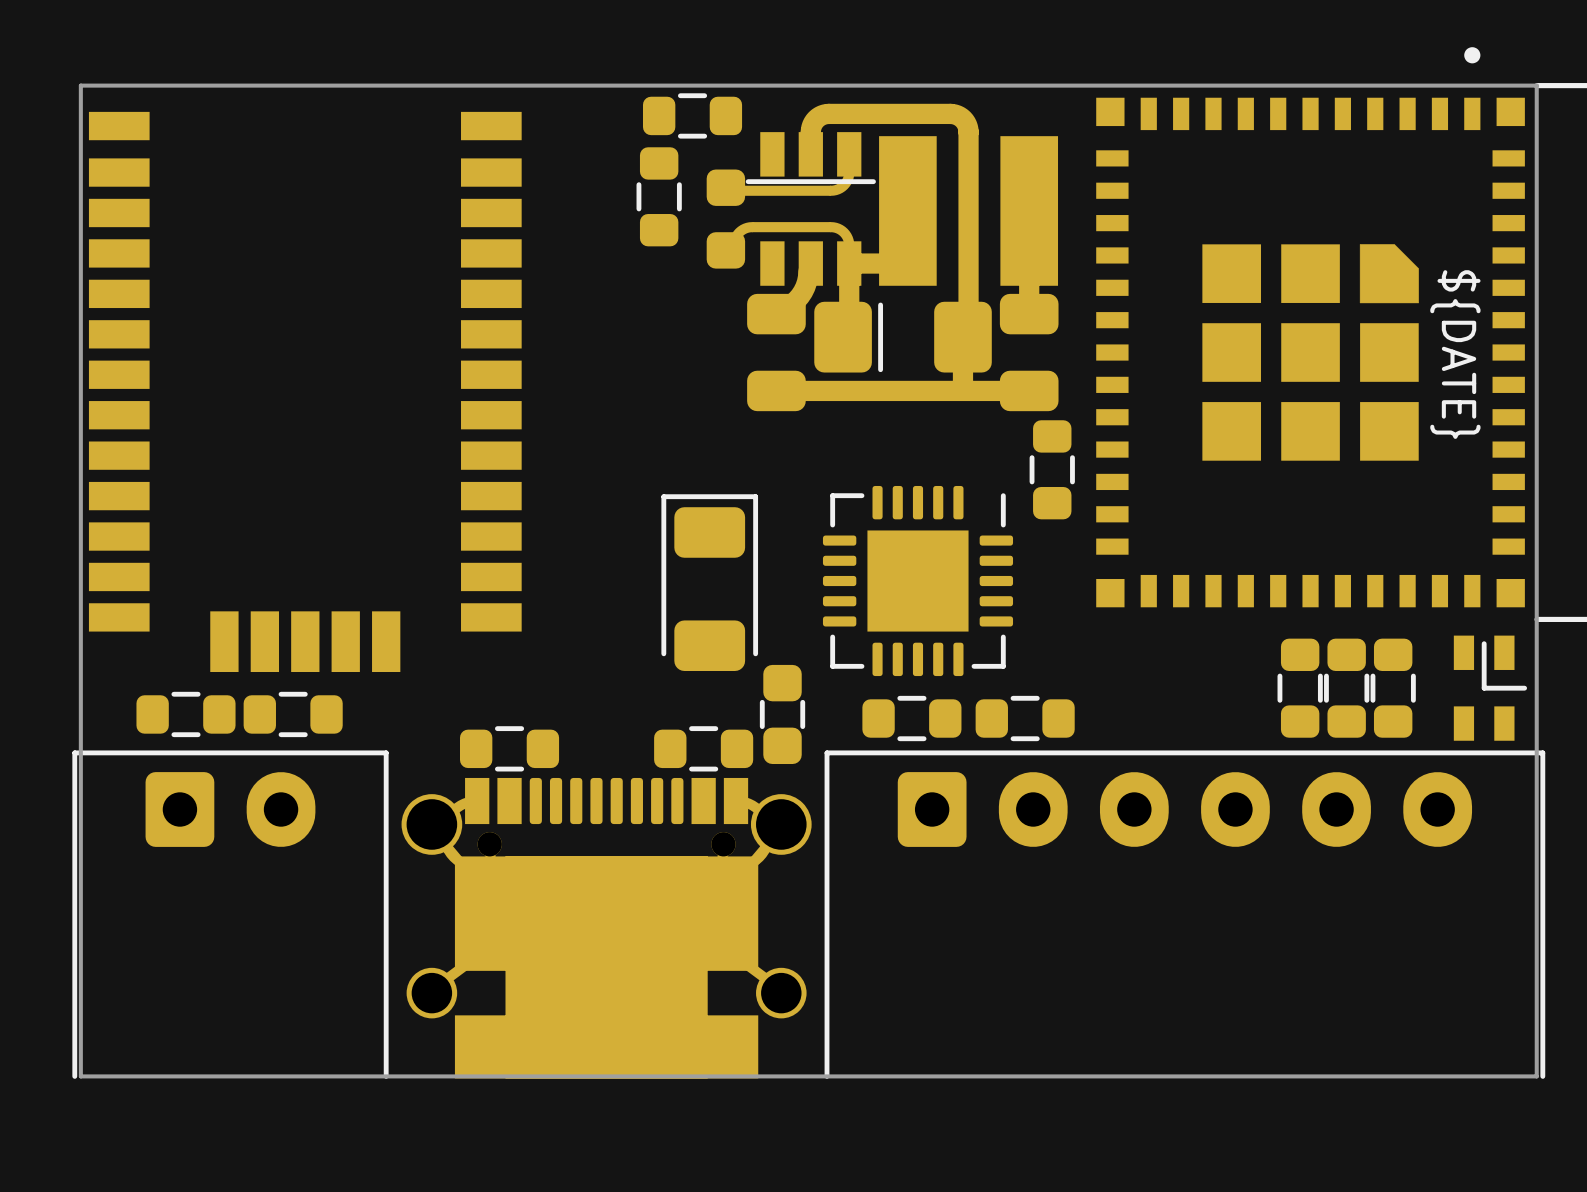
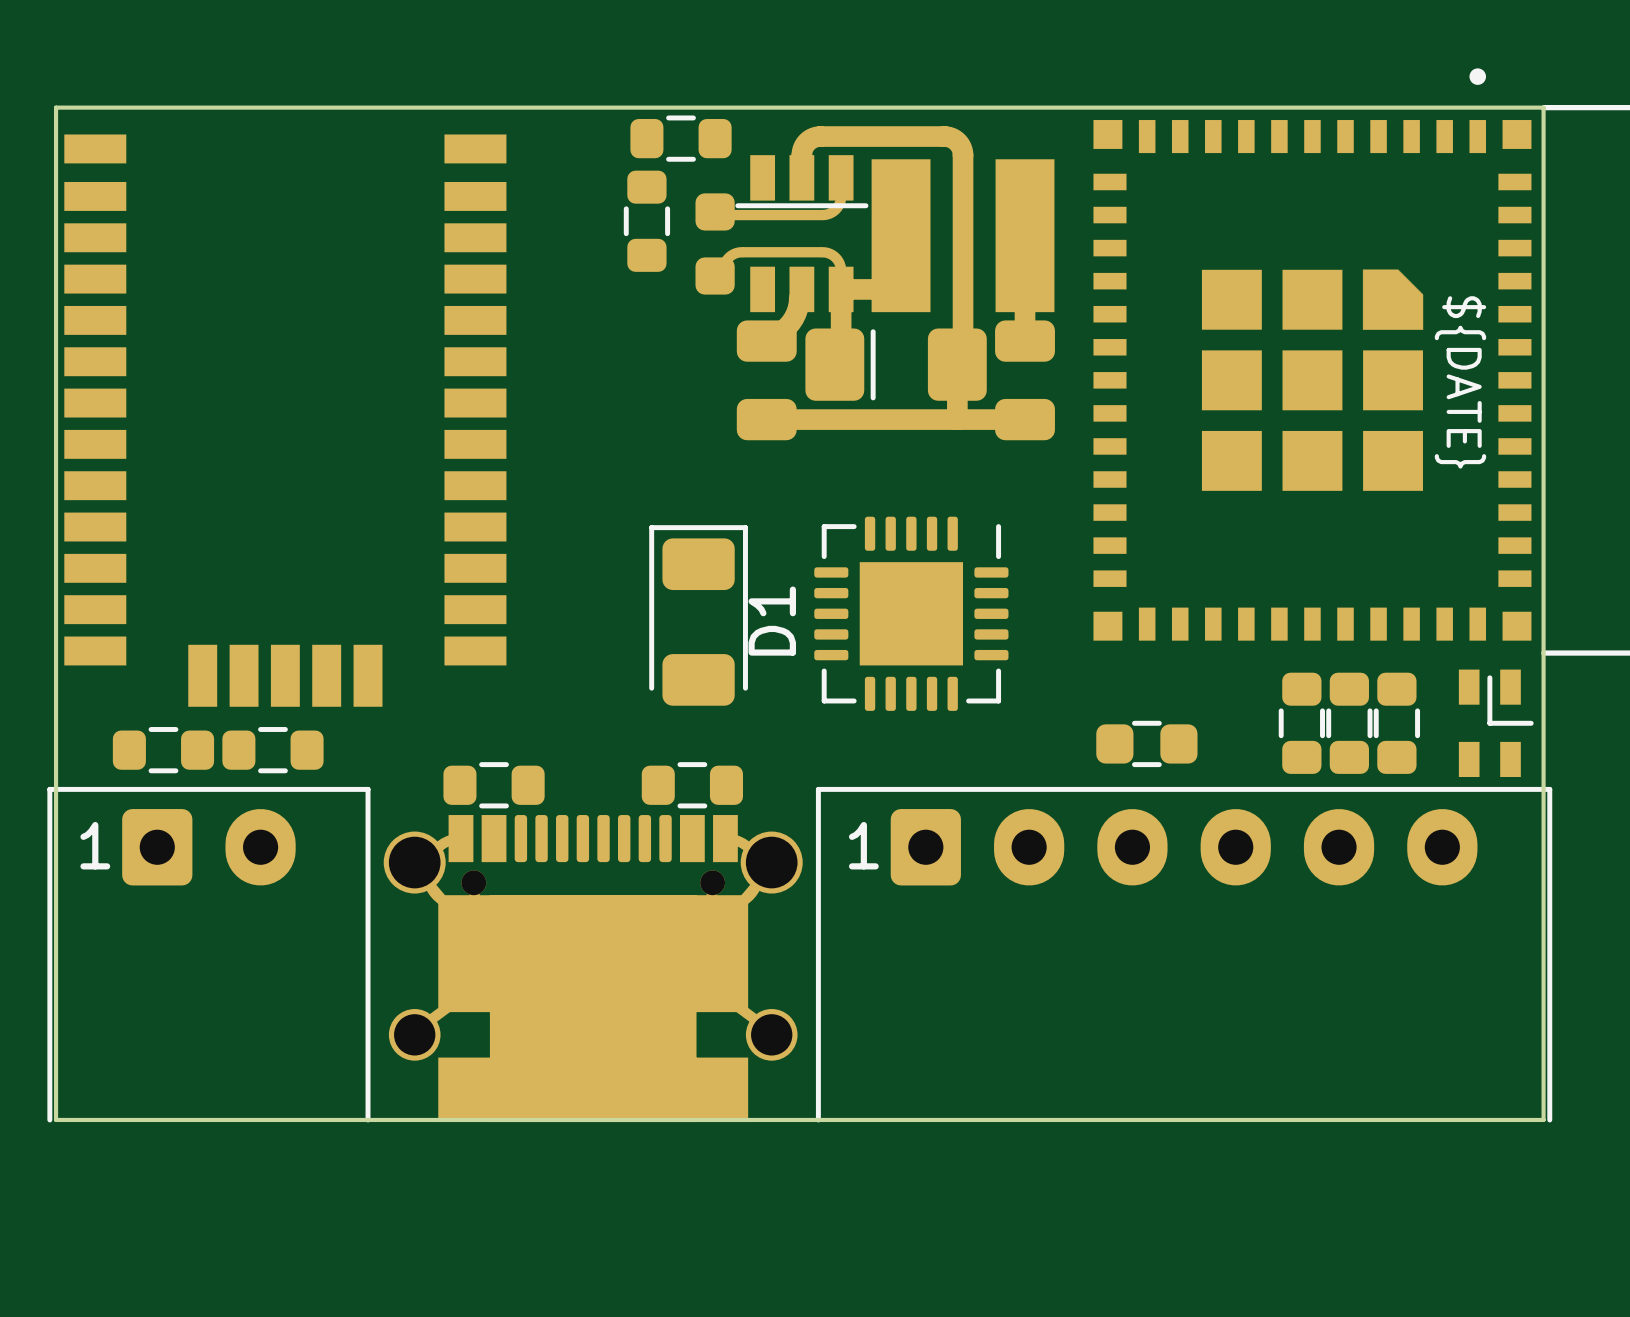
part: (1052, 469) -> none
D1 name: none -> D1 (772, 621)
part rotation: 0° (782, 714) -> 90° clockwise (1146, 743)
part position: (782, 714) -> (1146, 743)
part: (911, 718) -> none
part: (1025, 718) -> none
part text: none -> 1 (95, 845)
part text: none -> 1 (863, 845)

